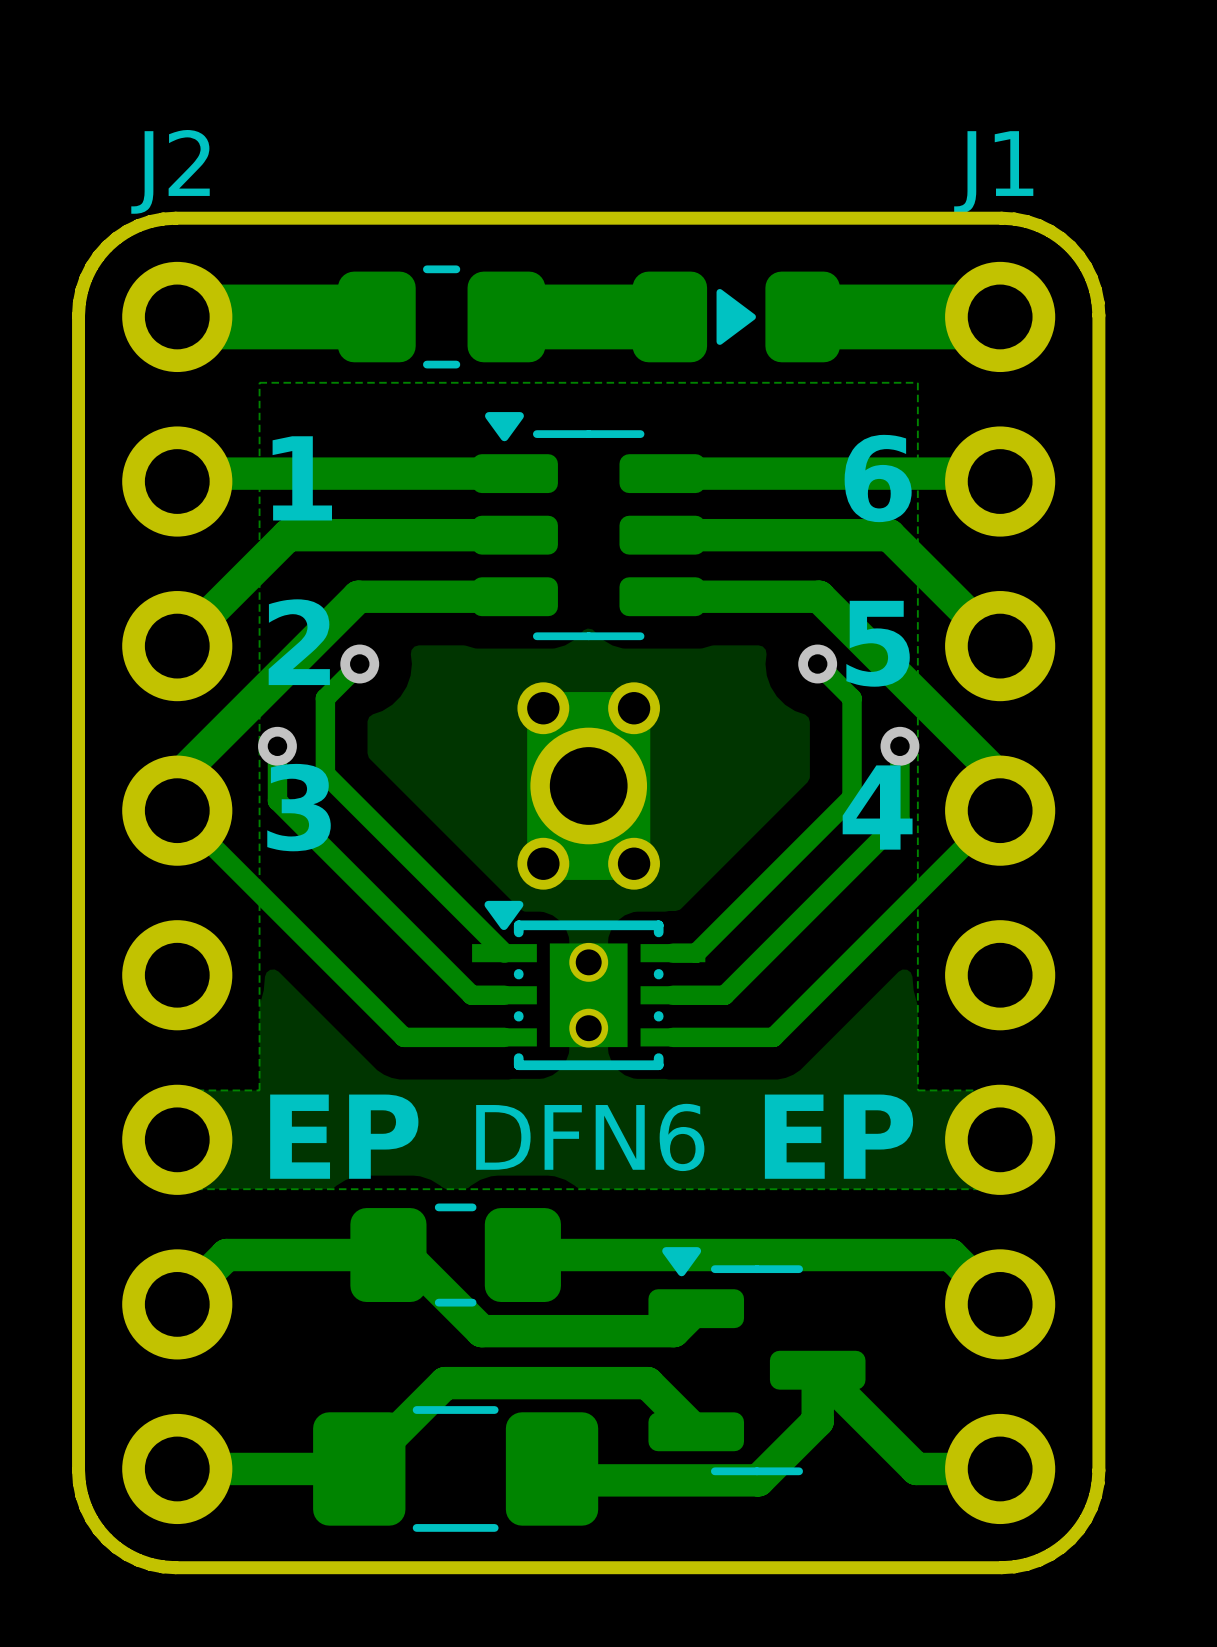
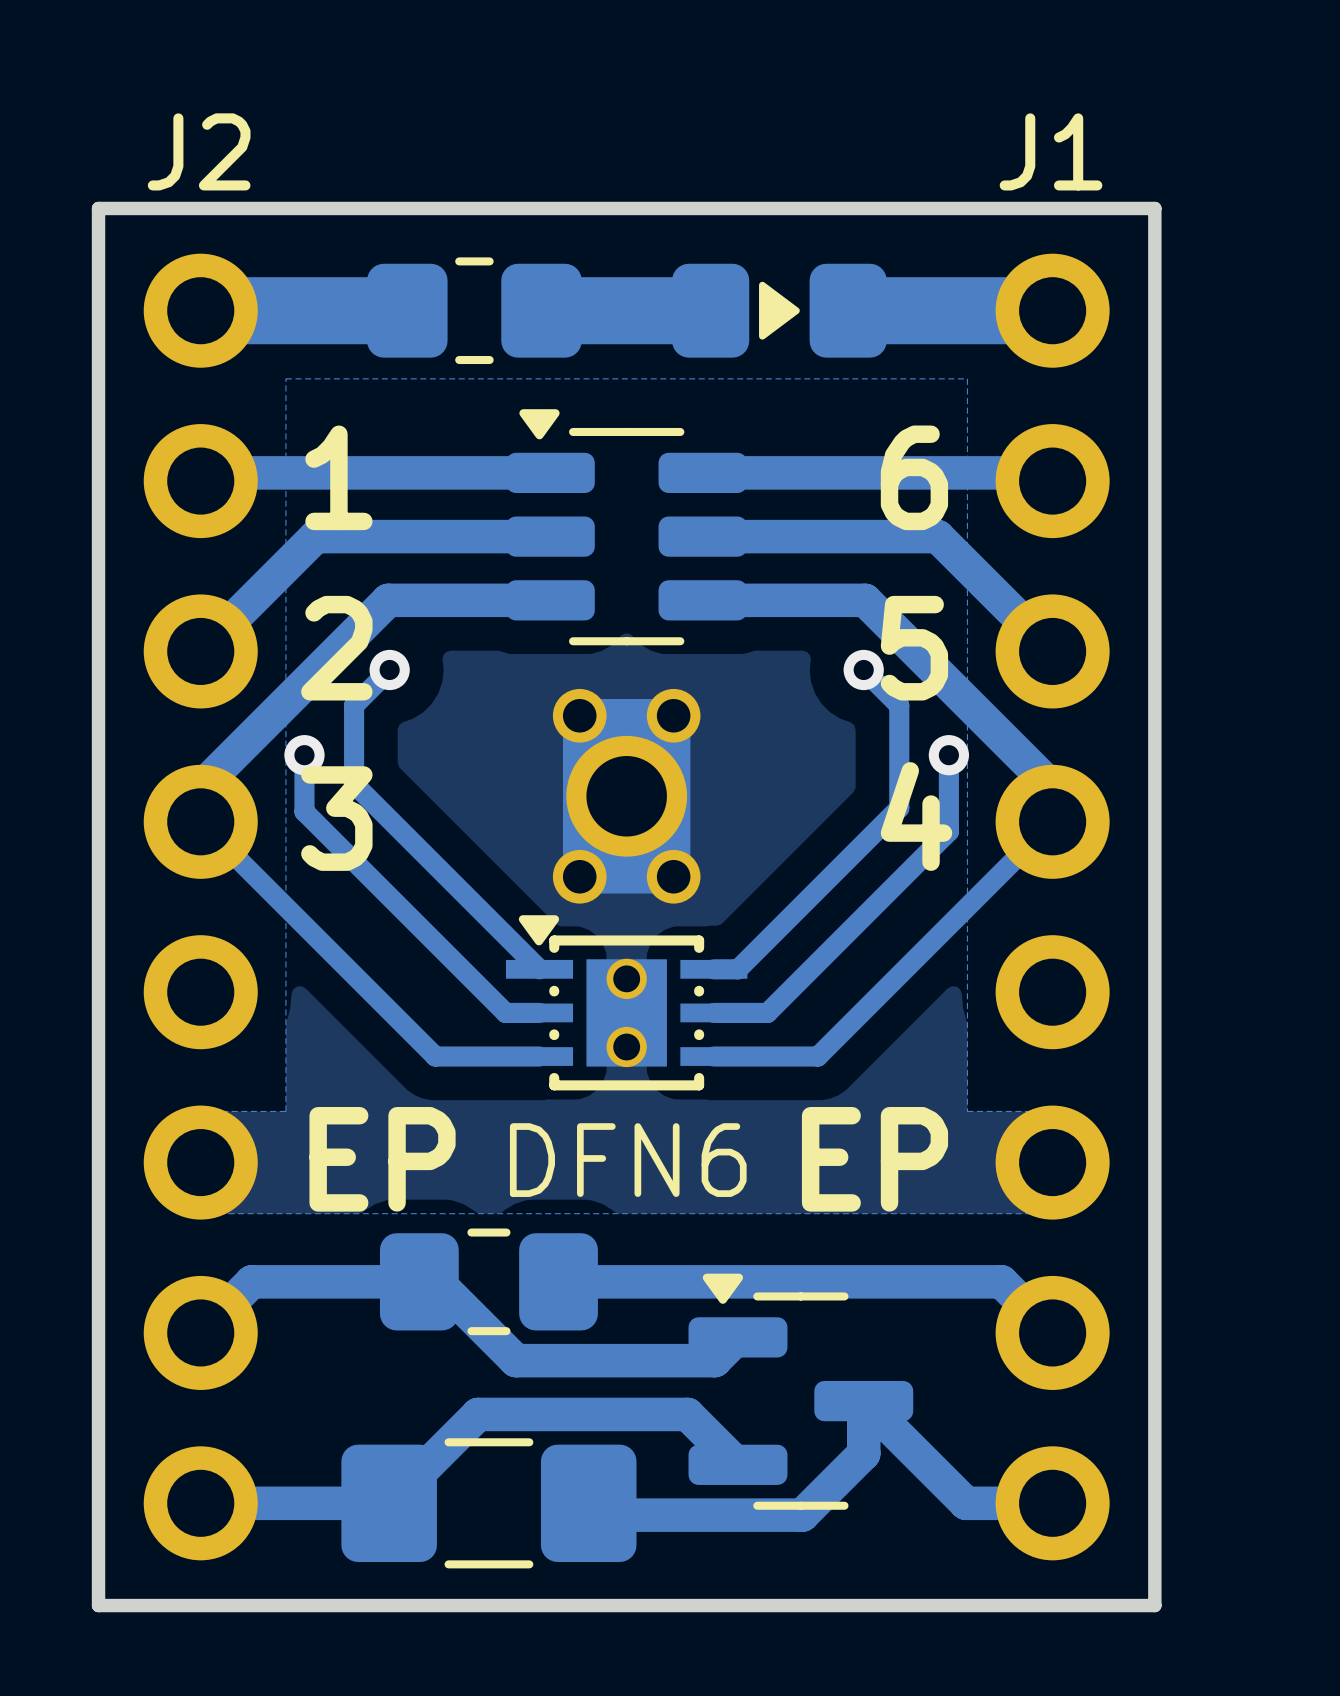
board edge: (175, 218) (150, 221) (138, 225) (116, 238) (106, 246) (91, 266) (85, 278) (81, 290) (78, 315) -> (199, 208) (98, 208) (98, 309)
board edge: (1001, 218) (1026, 221) (1038, 225) (1050, 231) (1070, 246) (1078, 256) (1091, 278) (1098, 302) (1098, 315) -> (1054, 208) (1154, 208) (1154, 309)
board edge: (78, 1470) (81, 1495) (85, 1507) (98, 1529) (106, 1539) (116, 1547) (138, 1560) (163, 1566) (175, 1567) -> (98, 1504) (98, 1605) (199, 1605)
board edge: (1098, 1470) (1098, 1483) (1091, 1507) (1078, 1529) (1070, 1539) (1060, 1547) (1038, 1560) (1026, 1564) (1001, 1567) -> (1154, 1504) (1154, 1605) (1054, 1605)

